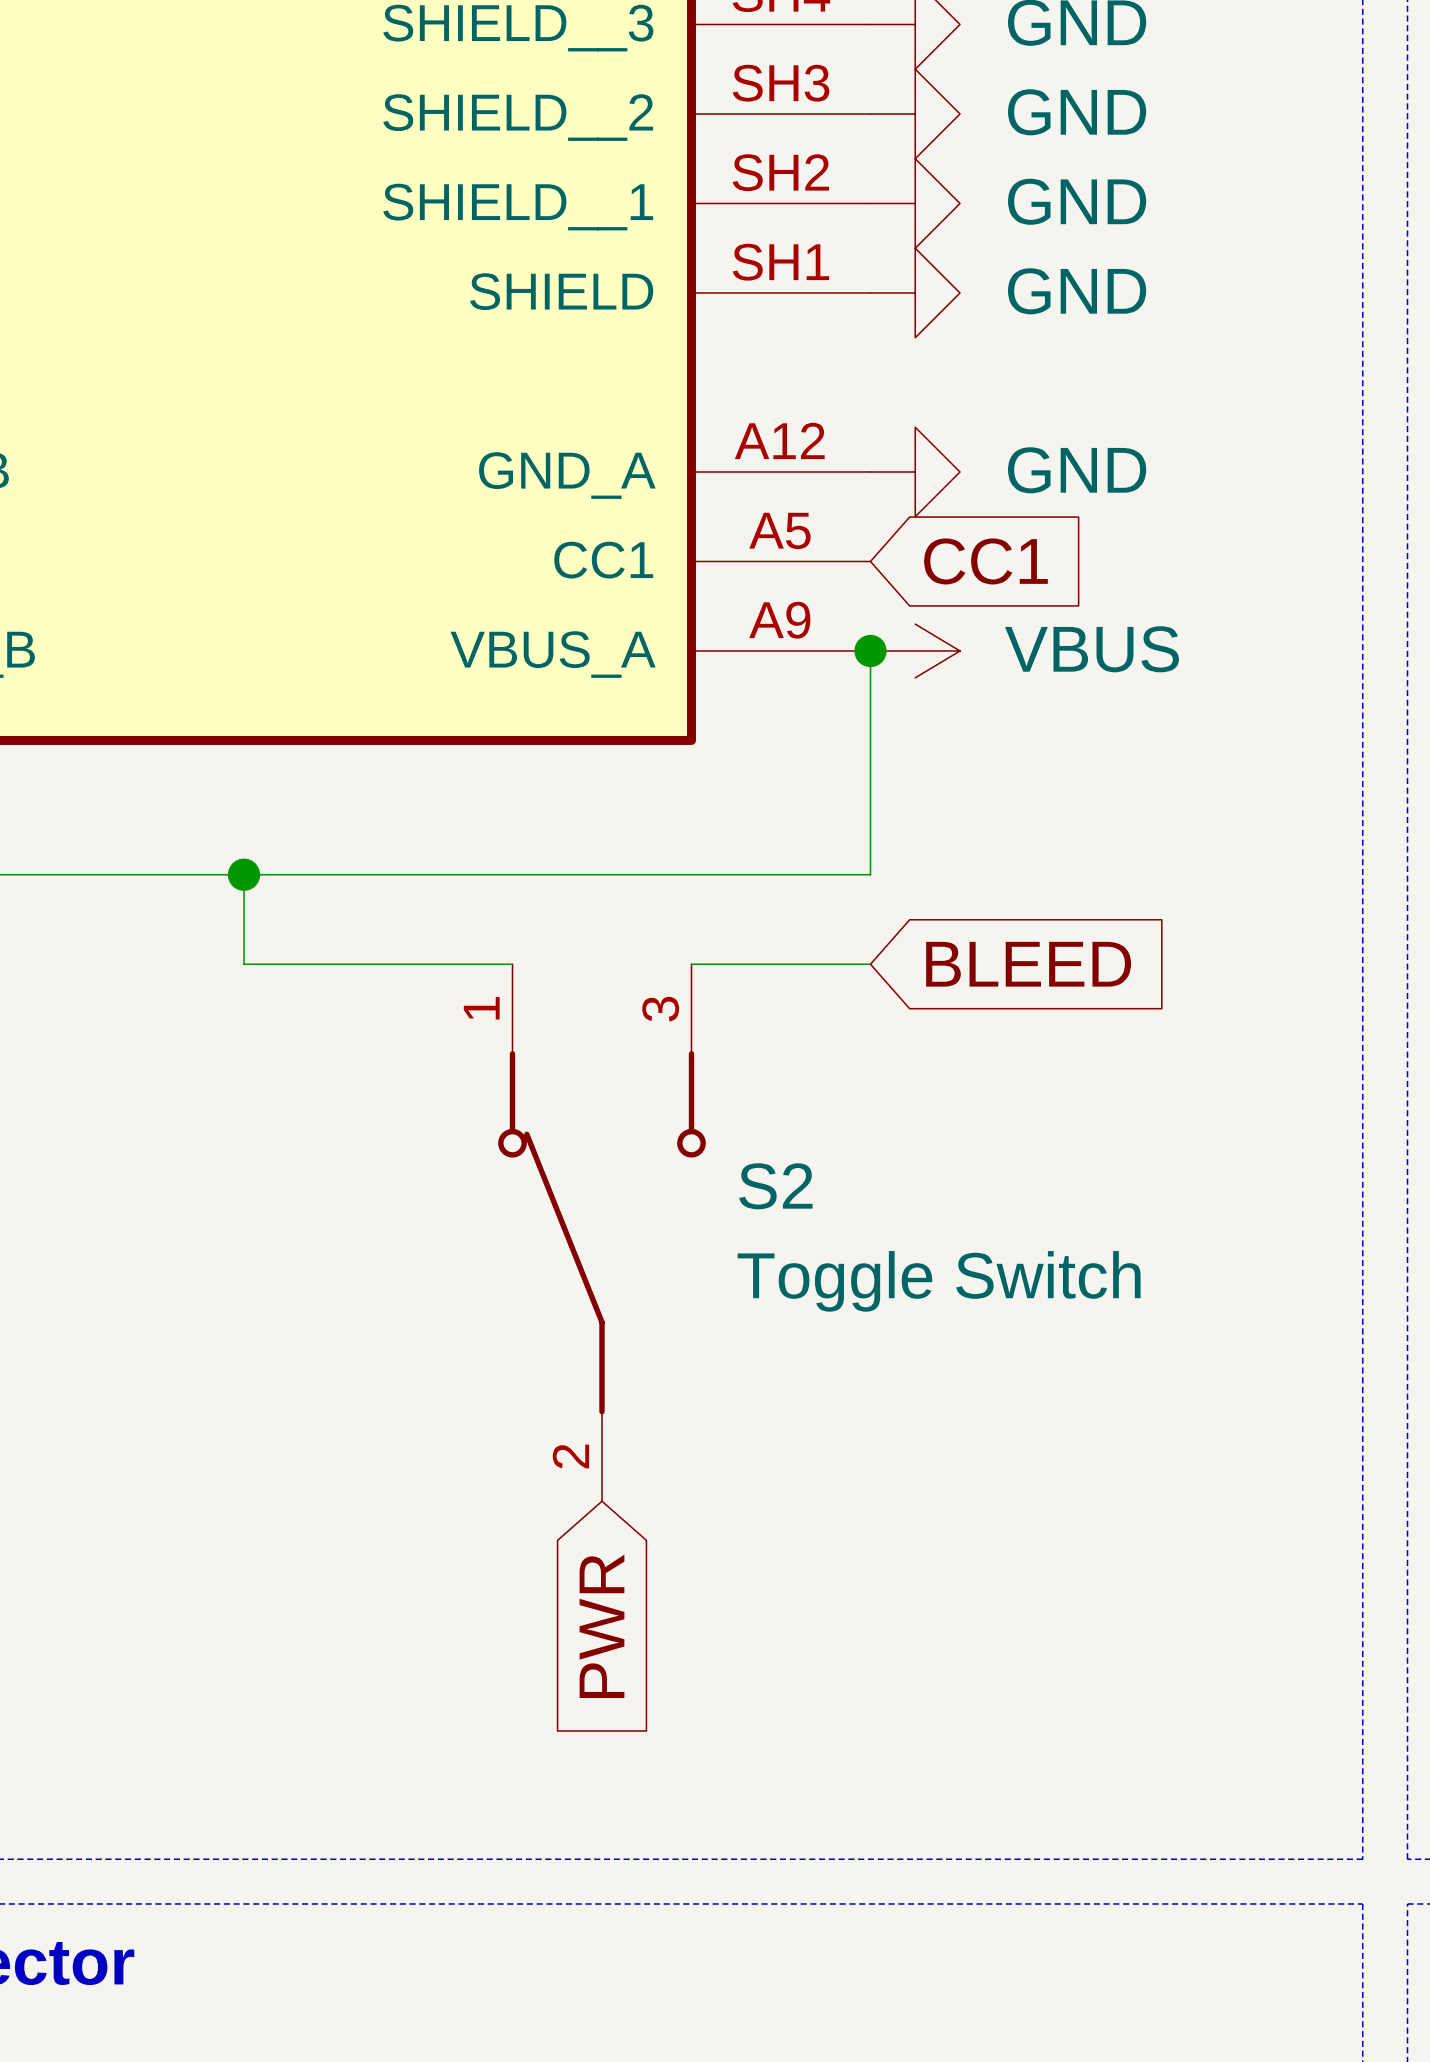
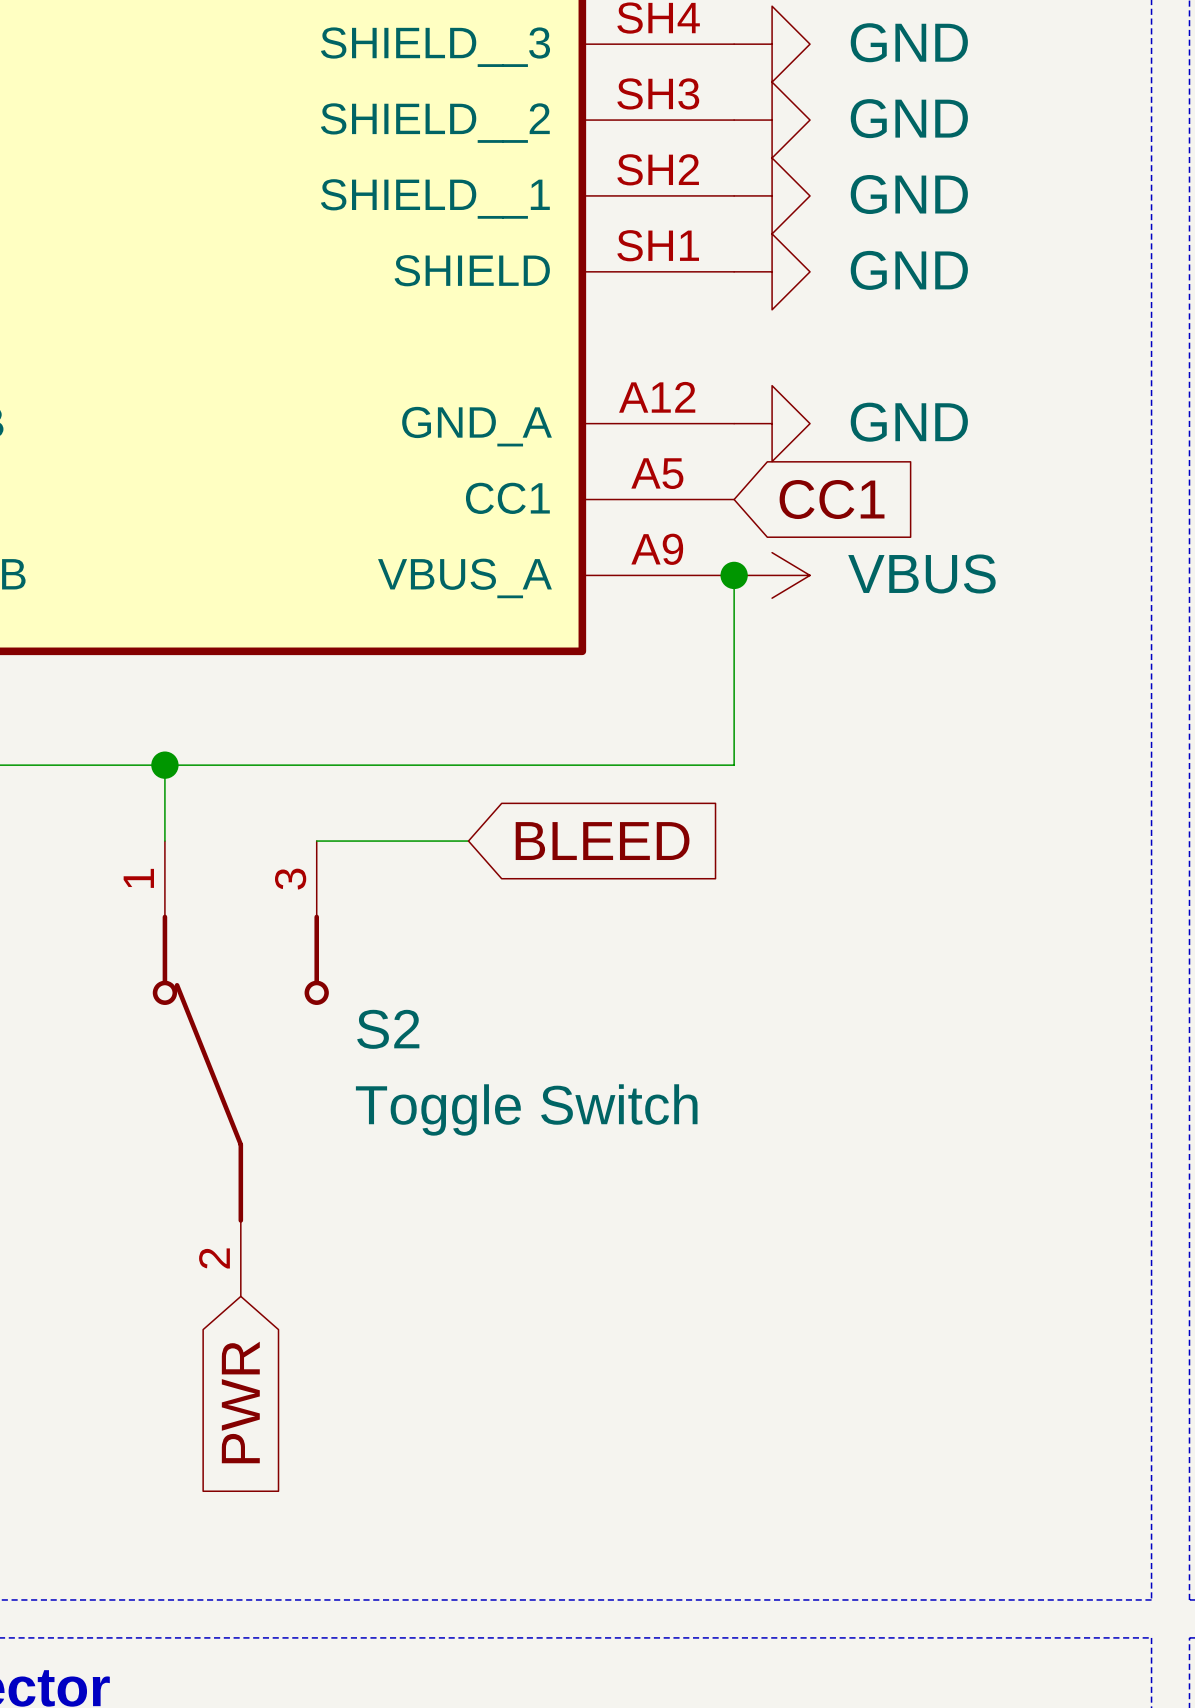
wire: none -> (164, 765) (164, 841)
wire: (244, 874) (244, 964) (378, 964) -> none
junction position: (244, 874) -> (164, 765)
wire: none -> (430, 841) (468, 841)
wire: (691, 964) (870, 964) -> none
global label position: BLEED (1028, 964) -> BLEED (602, 841)
S2 position: (602, 1232) -> (240, 1068)
global label position: PWR (602, 1626) -> PWR (240, 1402)

